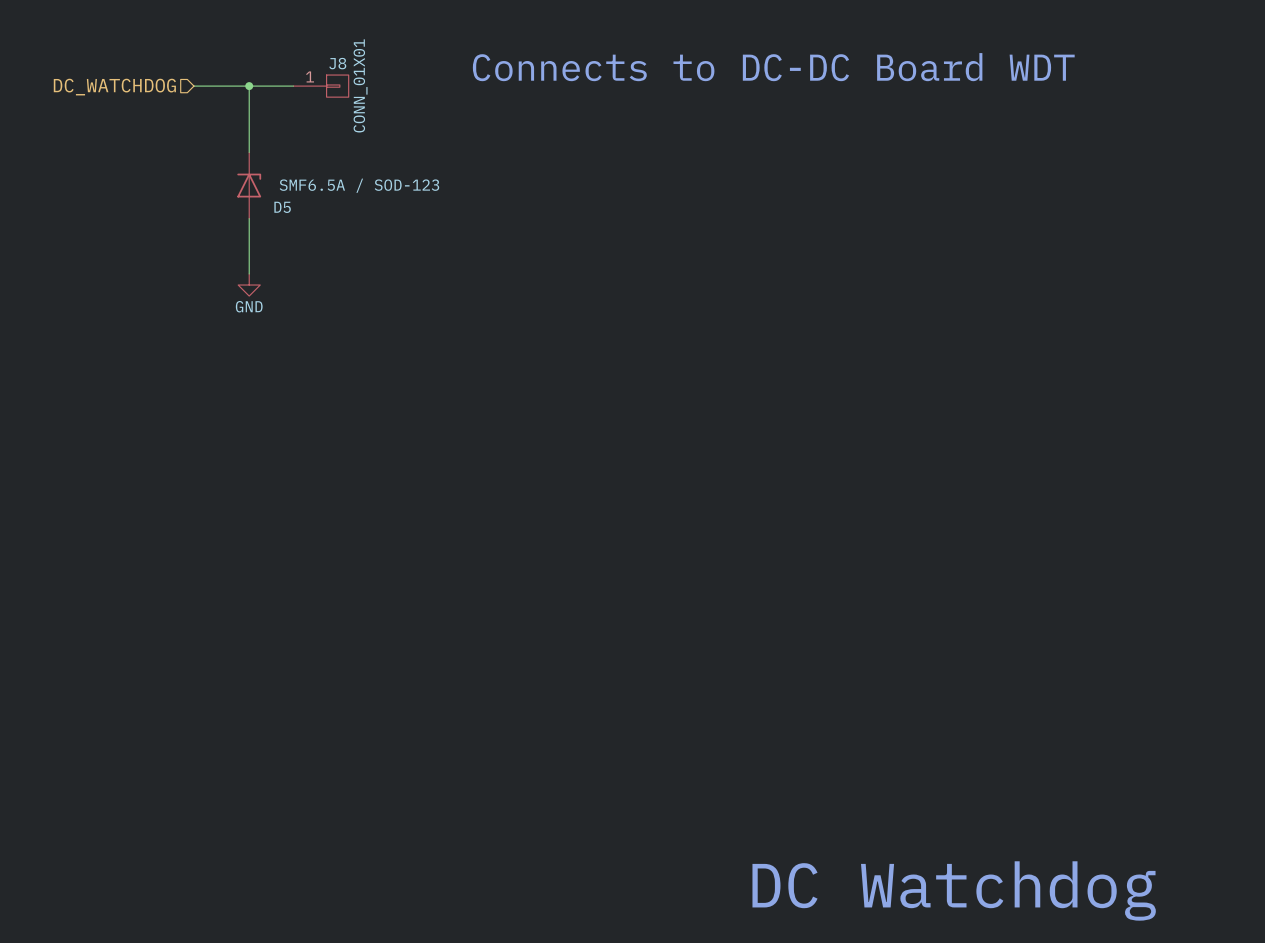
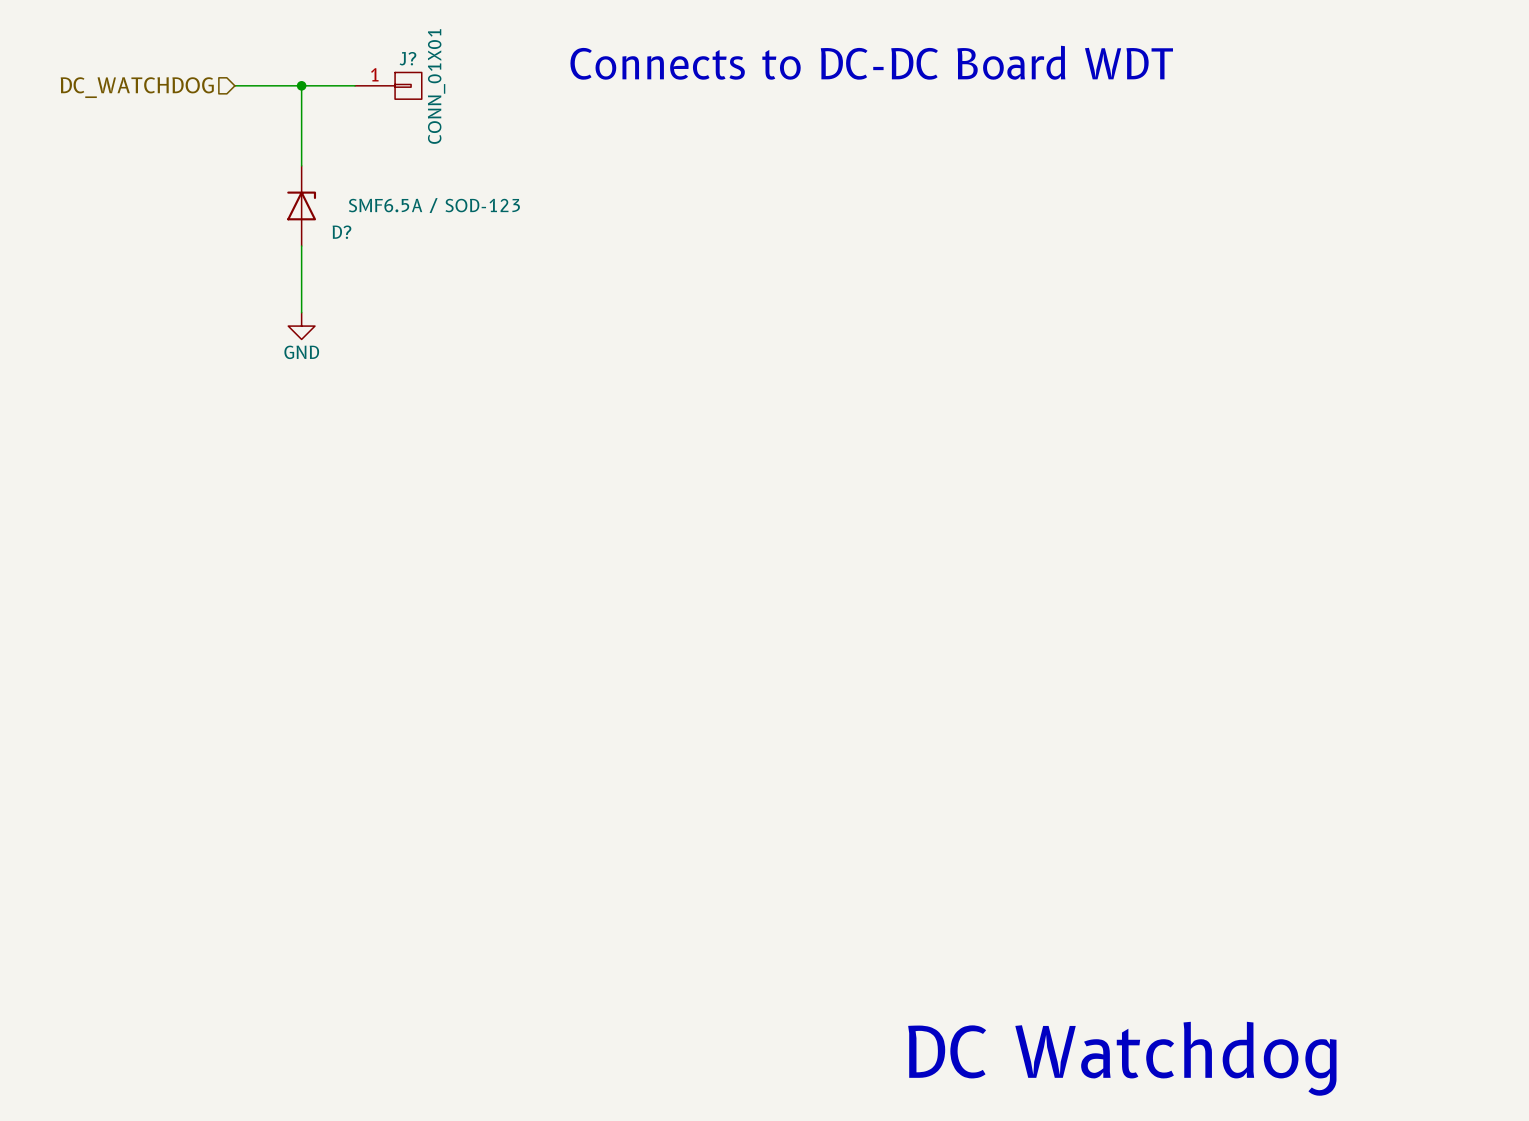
J8 name: J8 (337, 63) -> J? (407, 58)
D5 name: D5 (282, 207) -> D? (341, 232)

